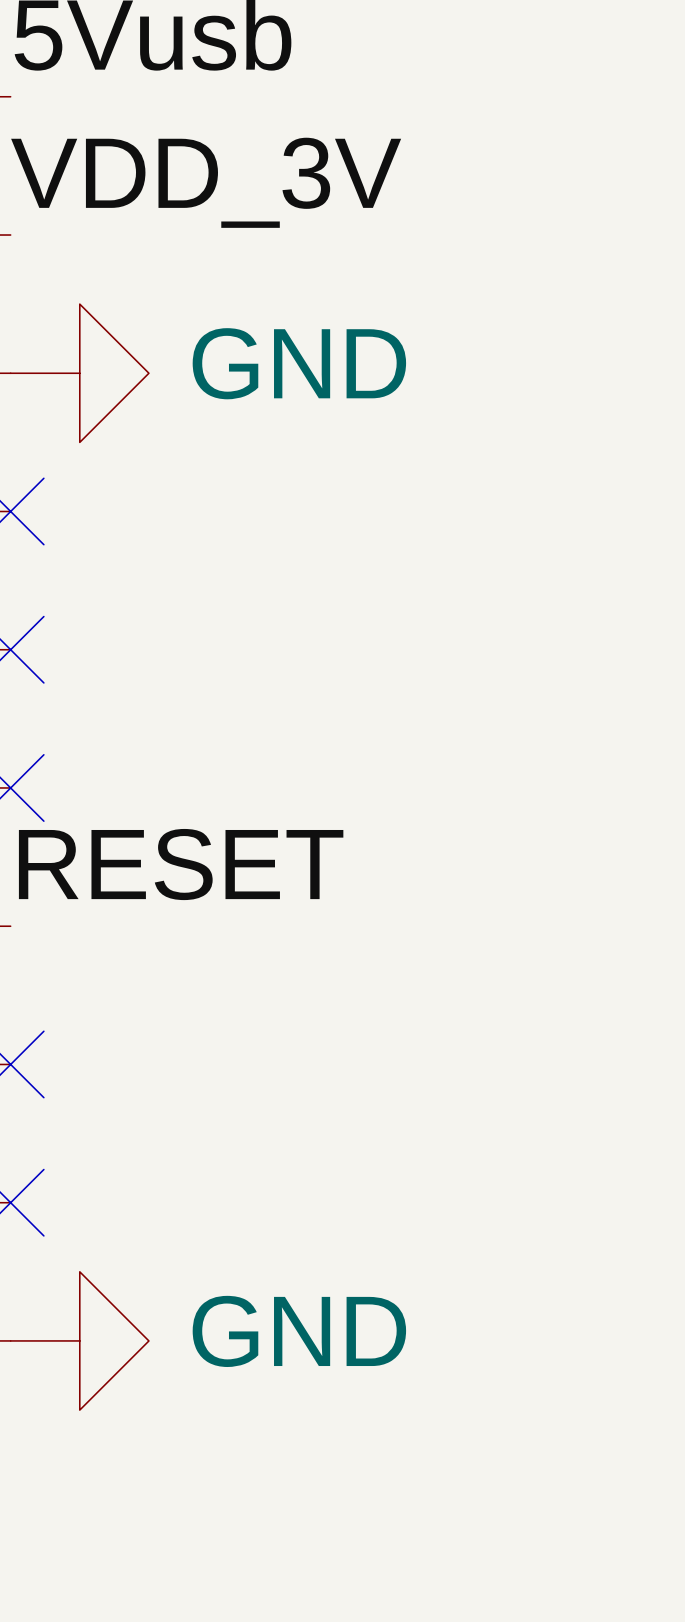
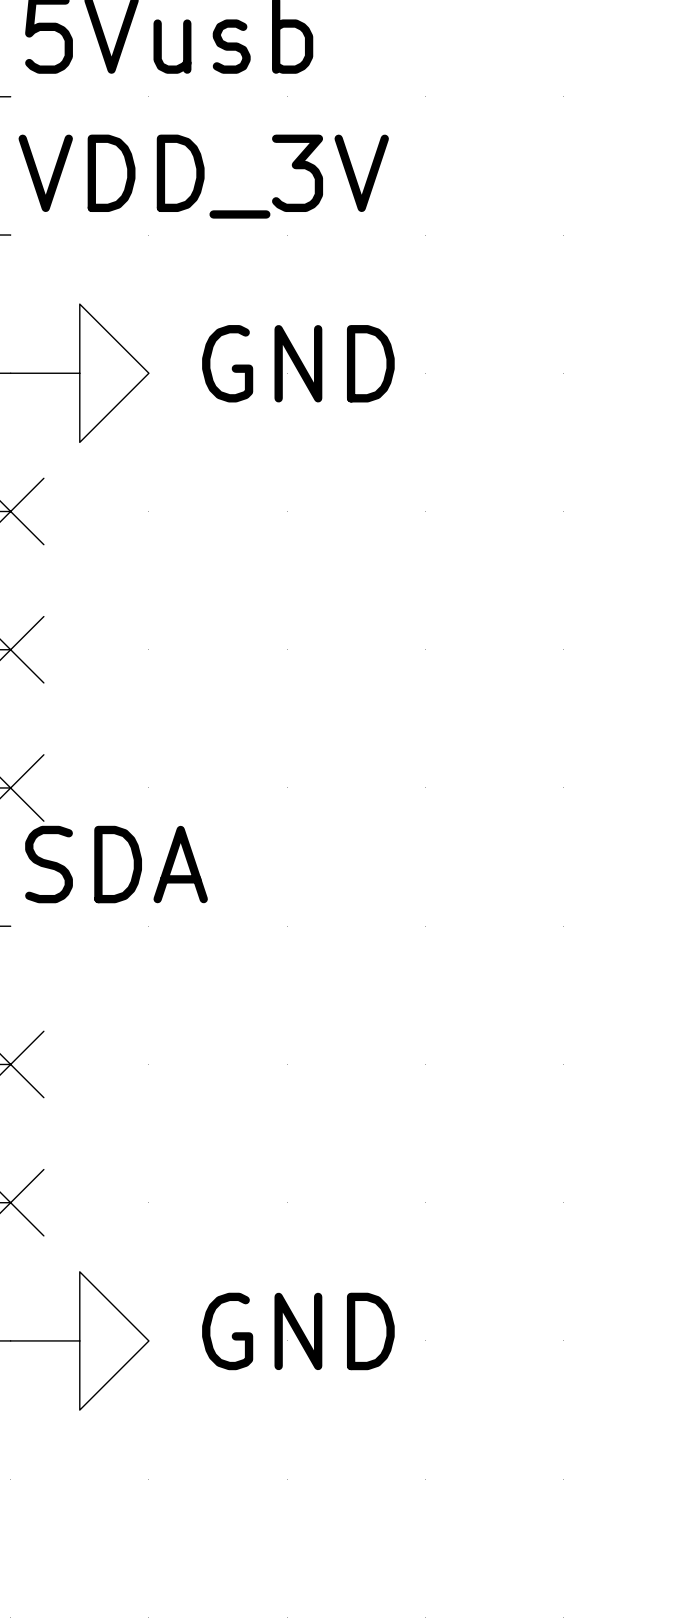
label: RESET (181, 864) -> SDA (116, 864)

